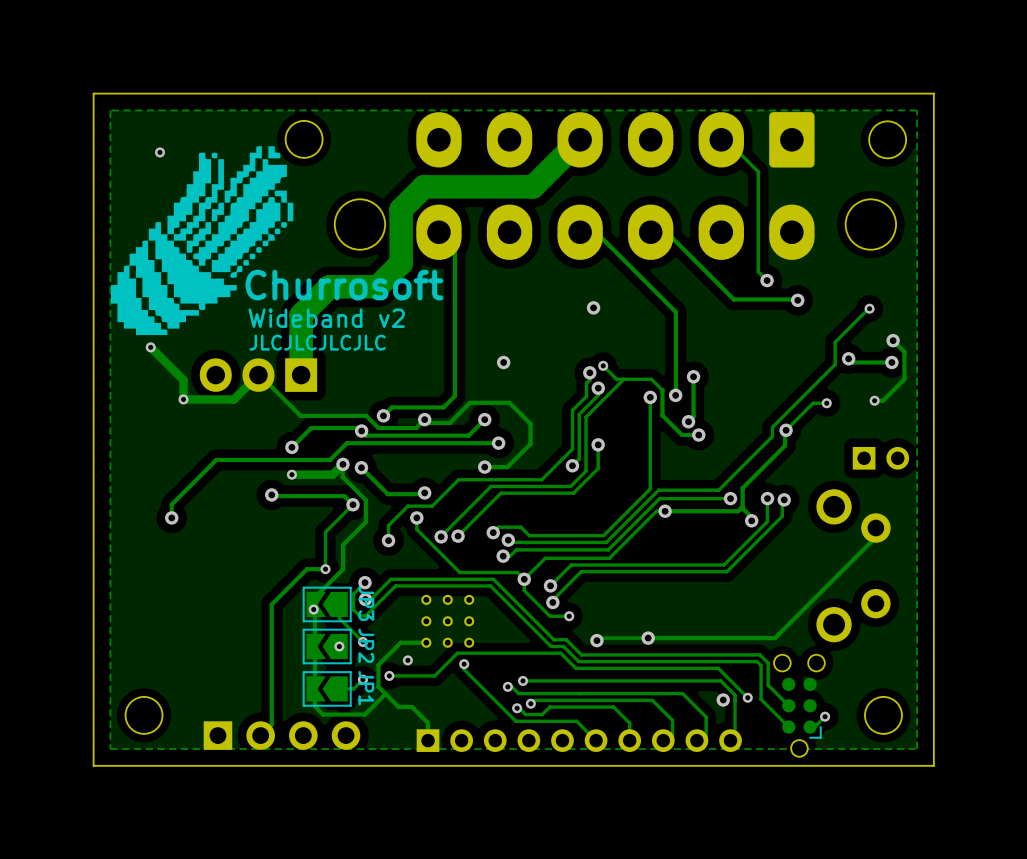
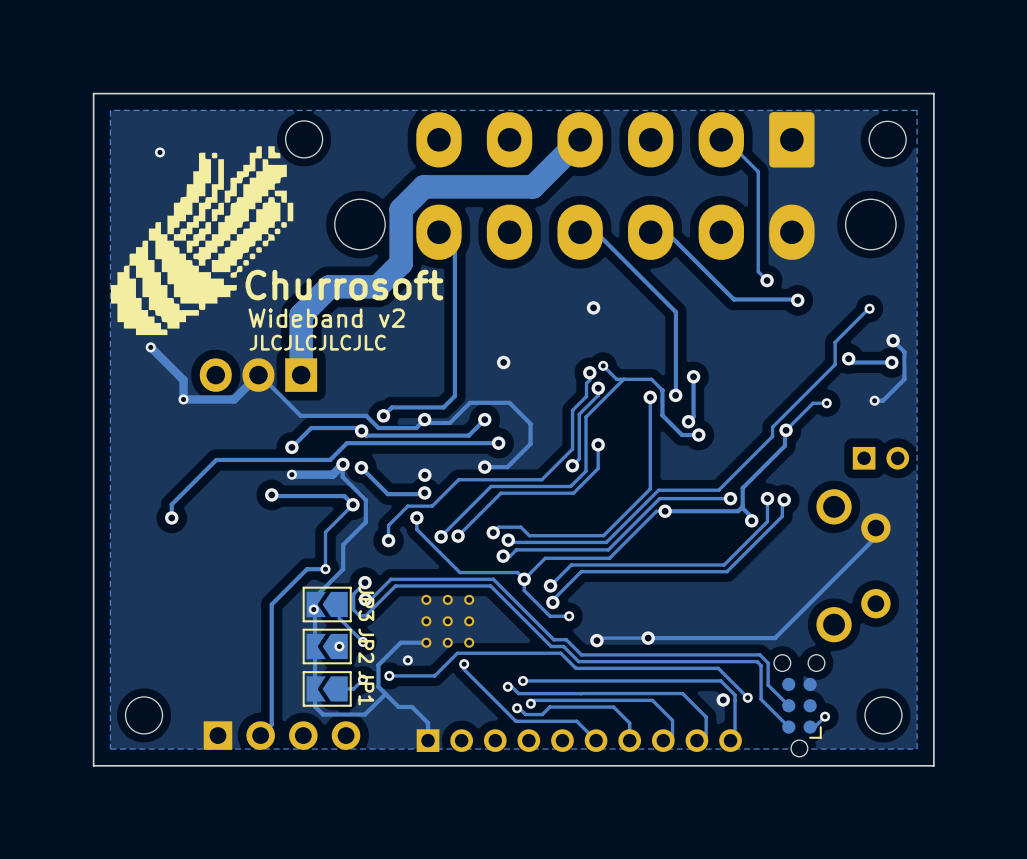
via: none -> (424, 475)

